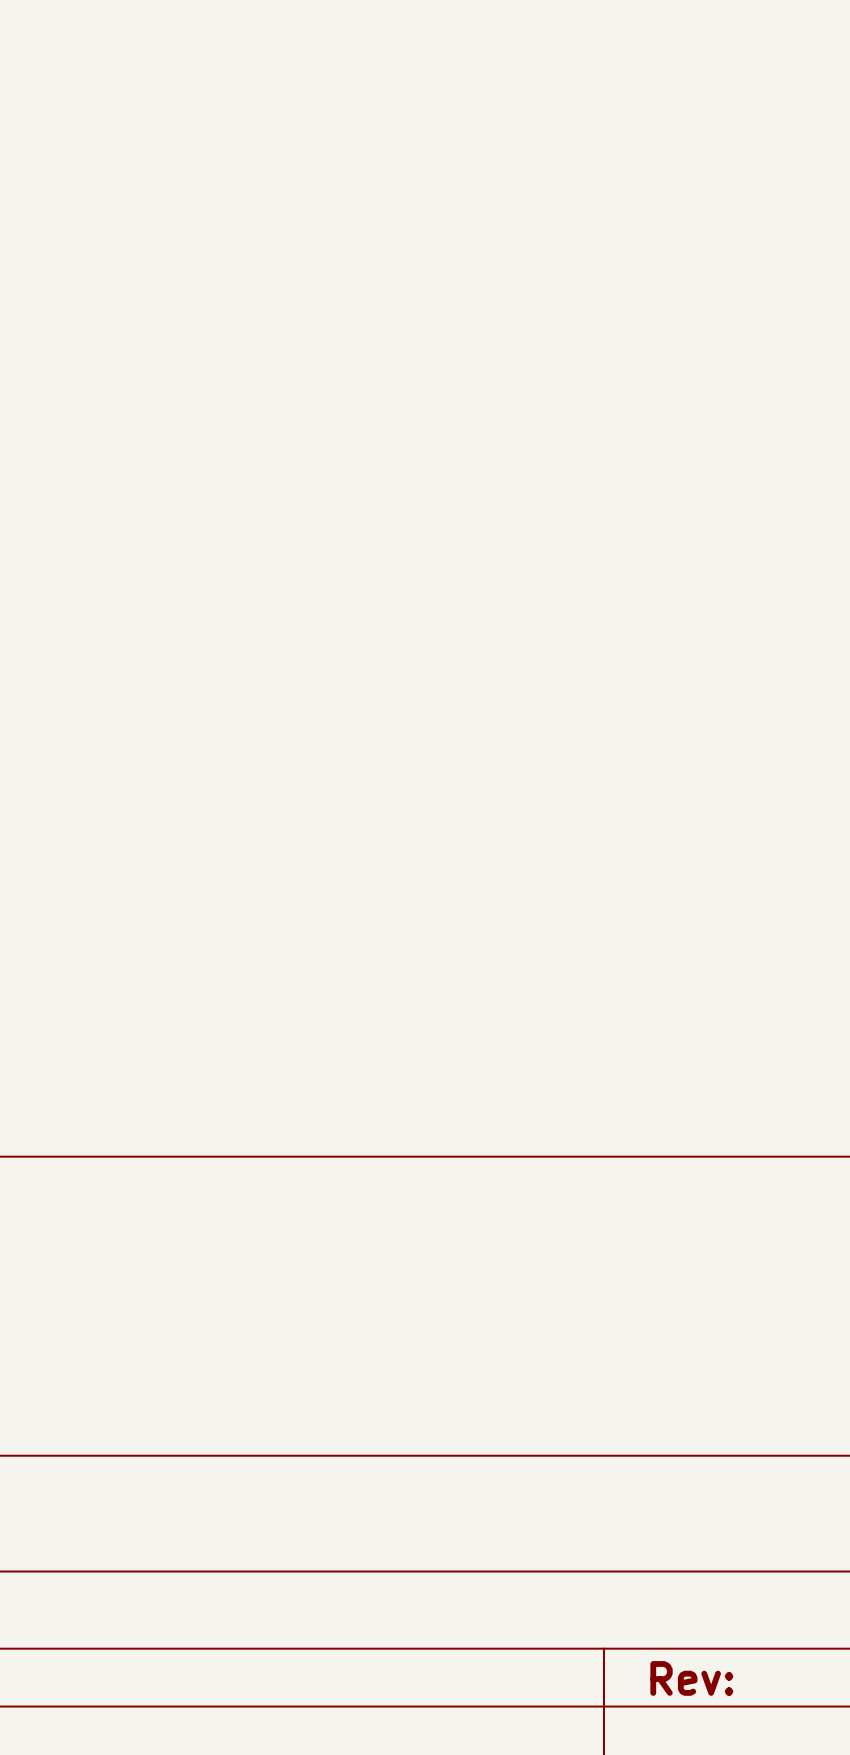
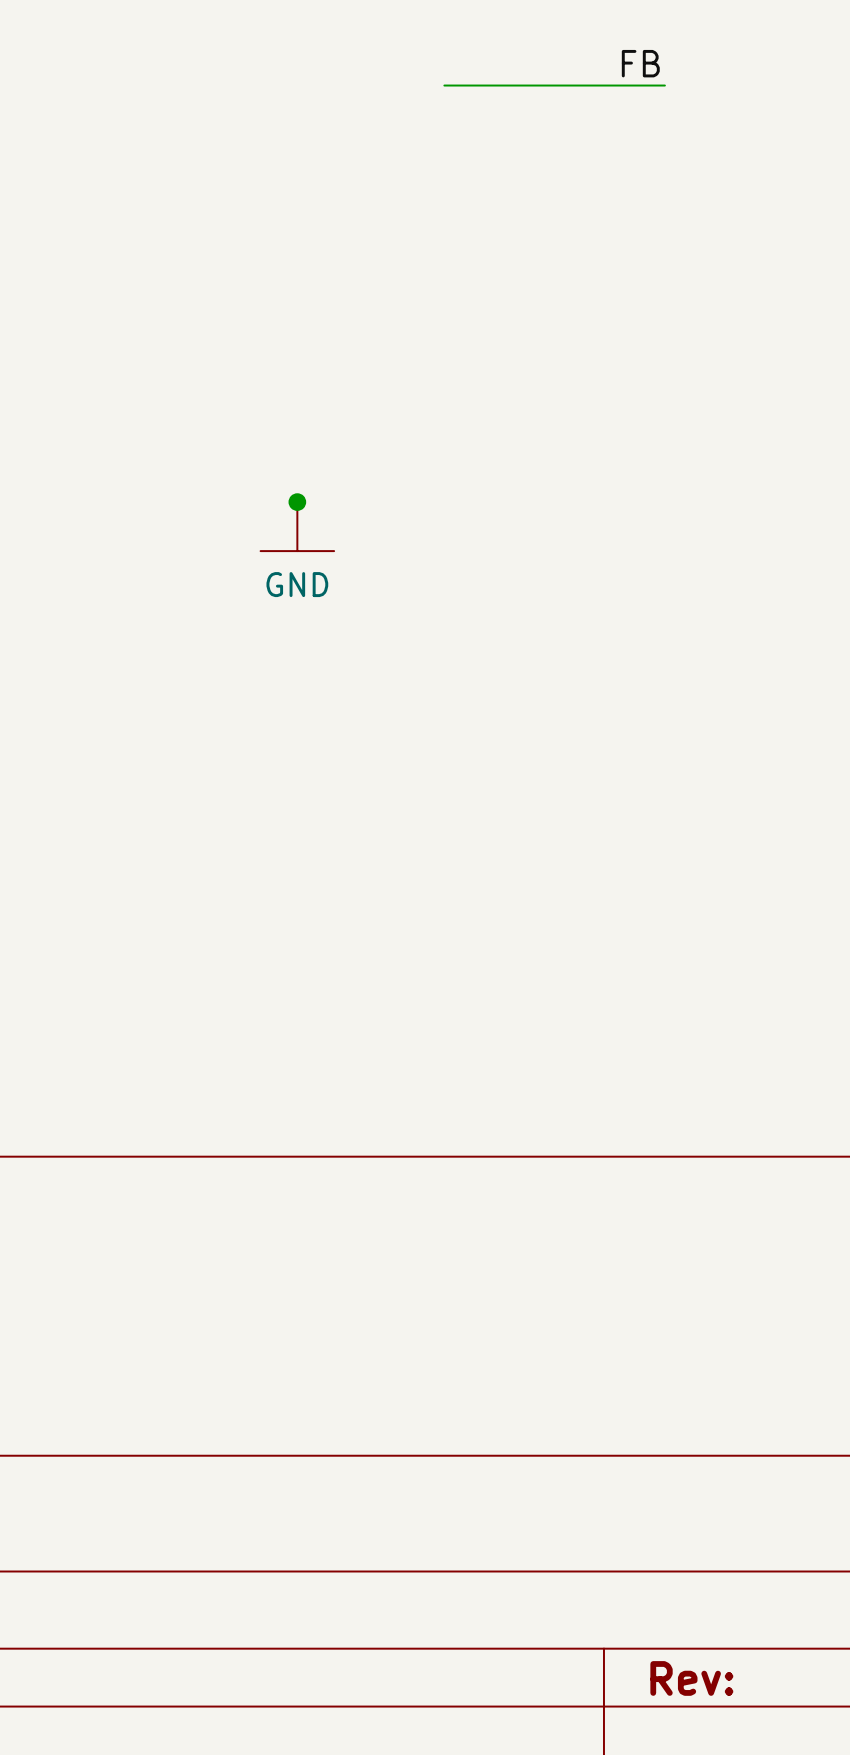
label: none -> FB (640, 63)
wire: none -> (444, 85) (664, 85)
junction: none -> (297, 502)
power symbol: none -> GND (297, 526)

